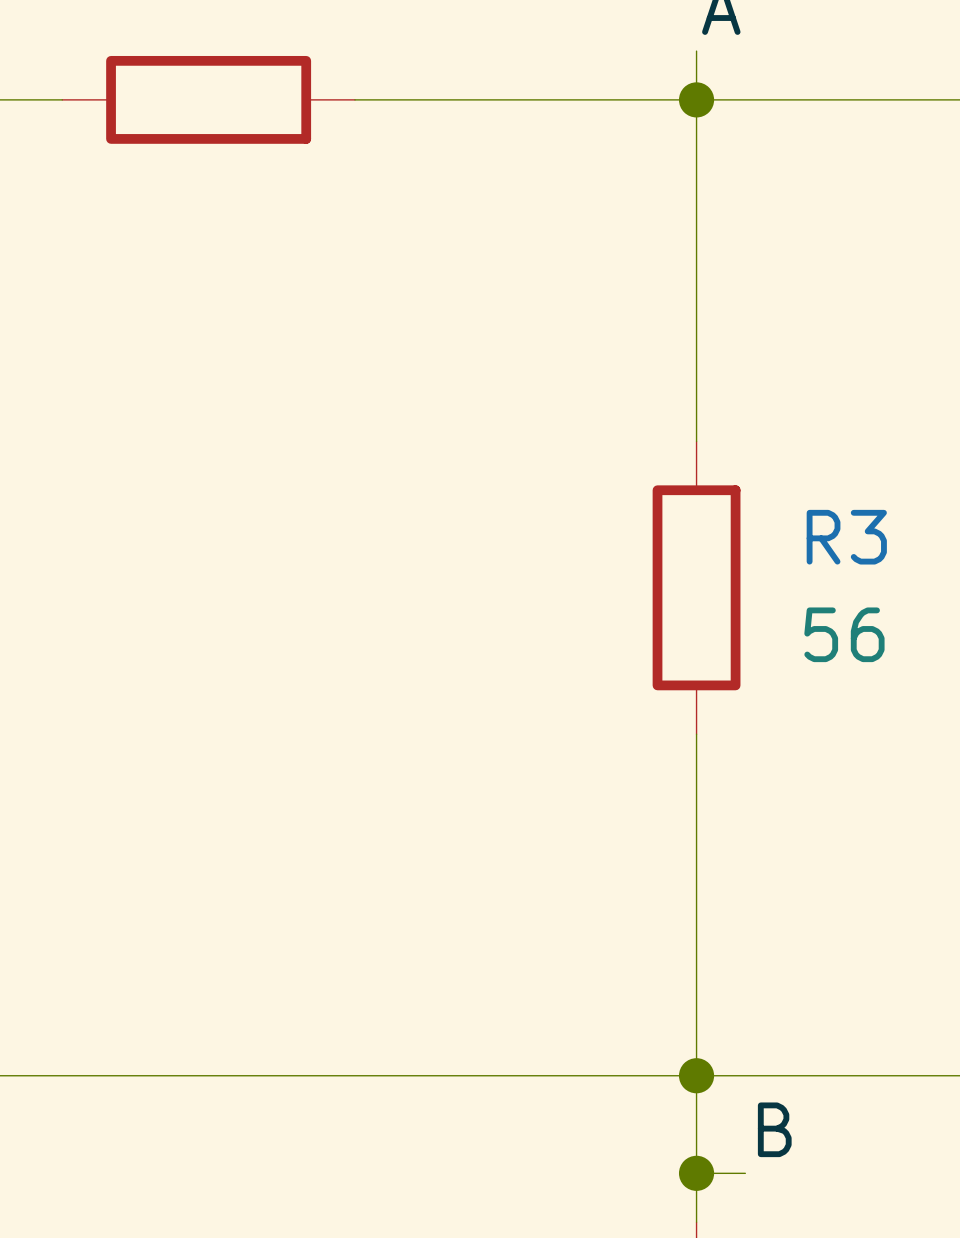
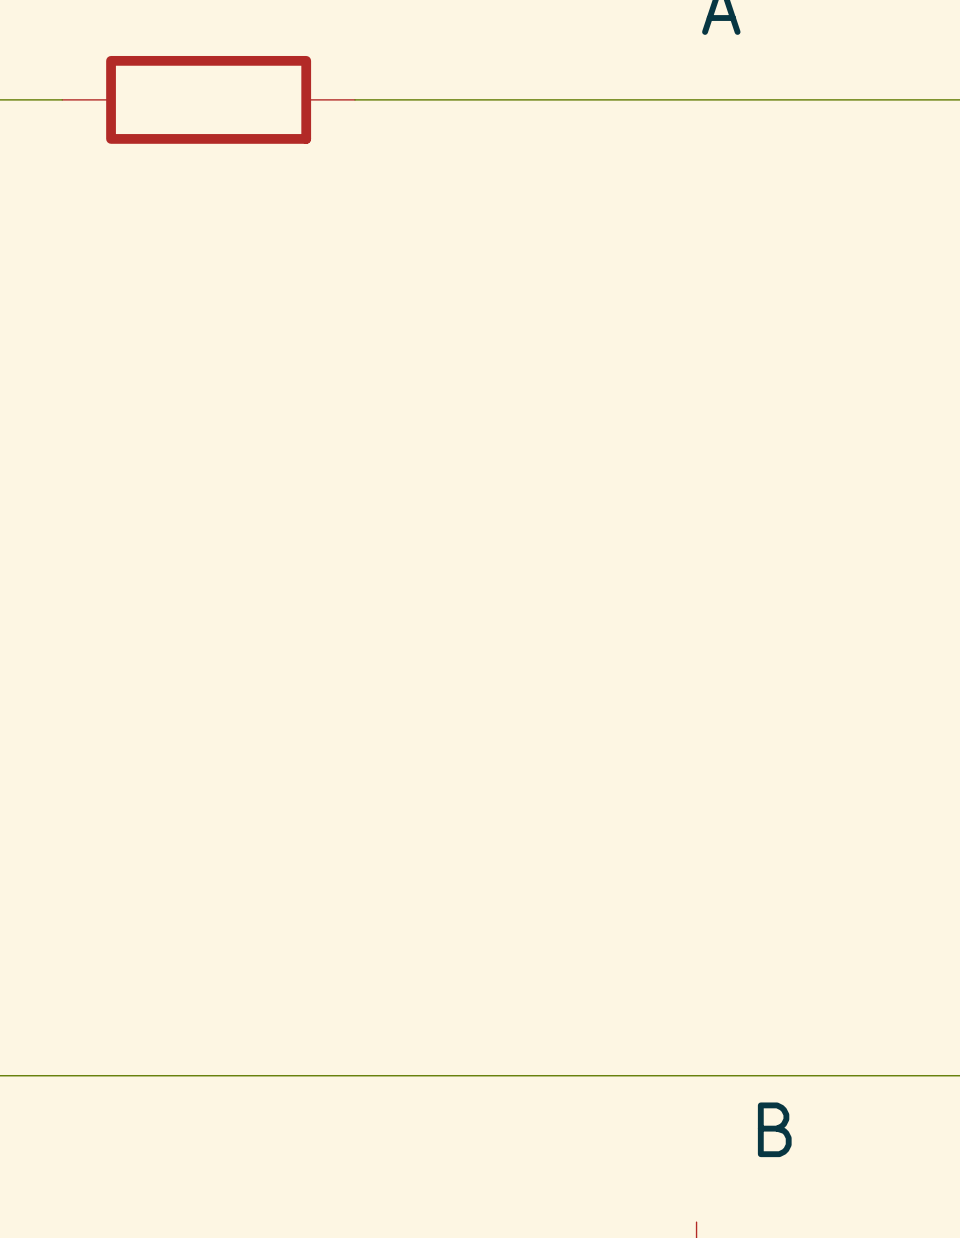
wire: (696, 51) (696, 441) -> none
junction: (696, 99) -> none
R3: 56 (696, 587) -> none
wire: (696, 734) (696, 1222) -> none
junction: (696, 1075) -> none
wire: (696, 1173) (745, 1173) -> none
junction: (696, 1173) -> none

